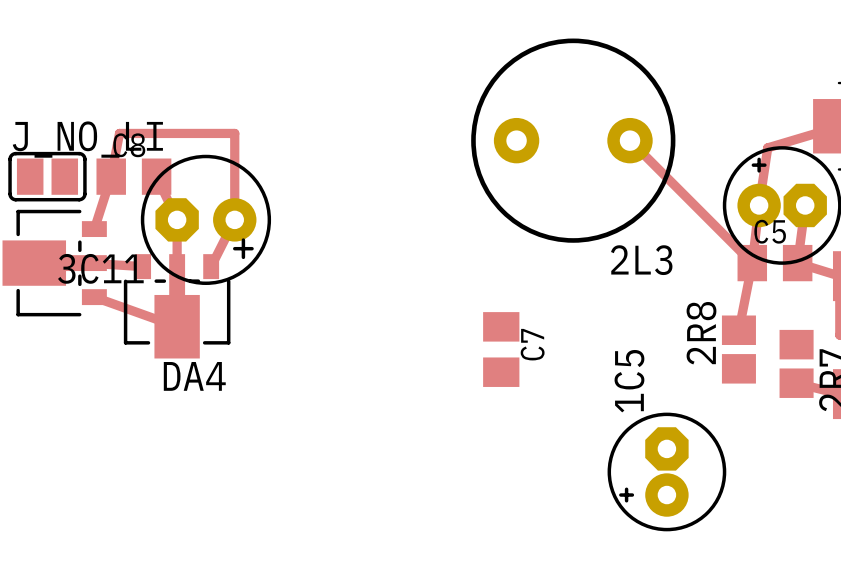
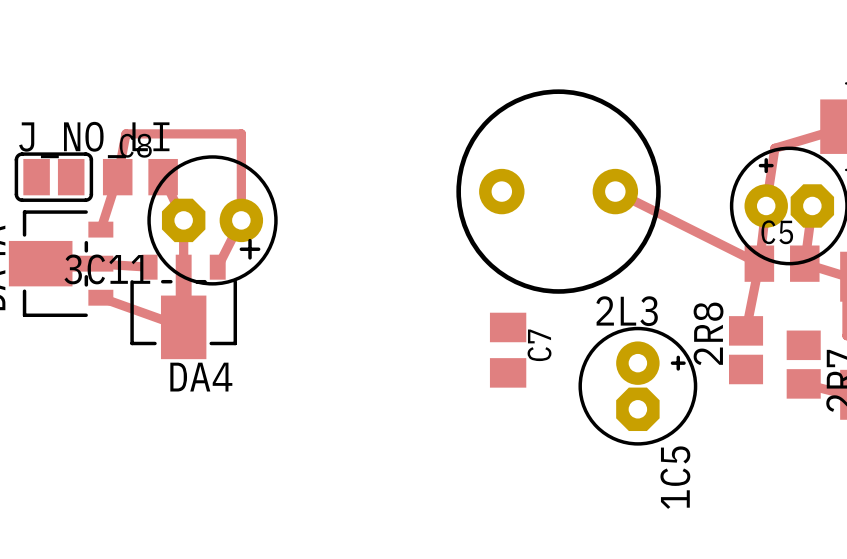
2L3 position: (573, 140) -> (558, 191)
top track: (630, 140) (752, 263) -> (615, 191) (759, 263)
1C5 name position: 1C5 (629, 381) -> 1C5 (675, 477)
1C5 footprint: [607, 412, 727, 532] -> [578, 326, 698, 446]

